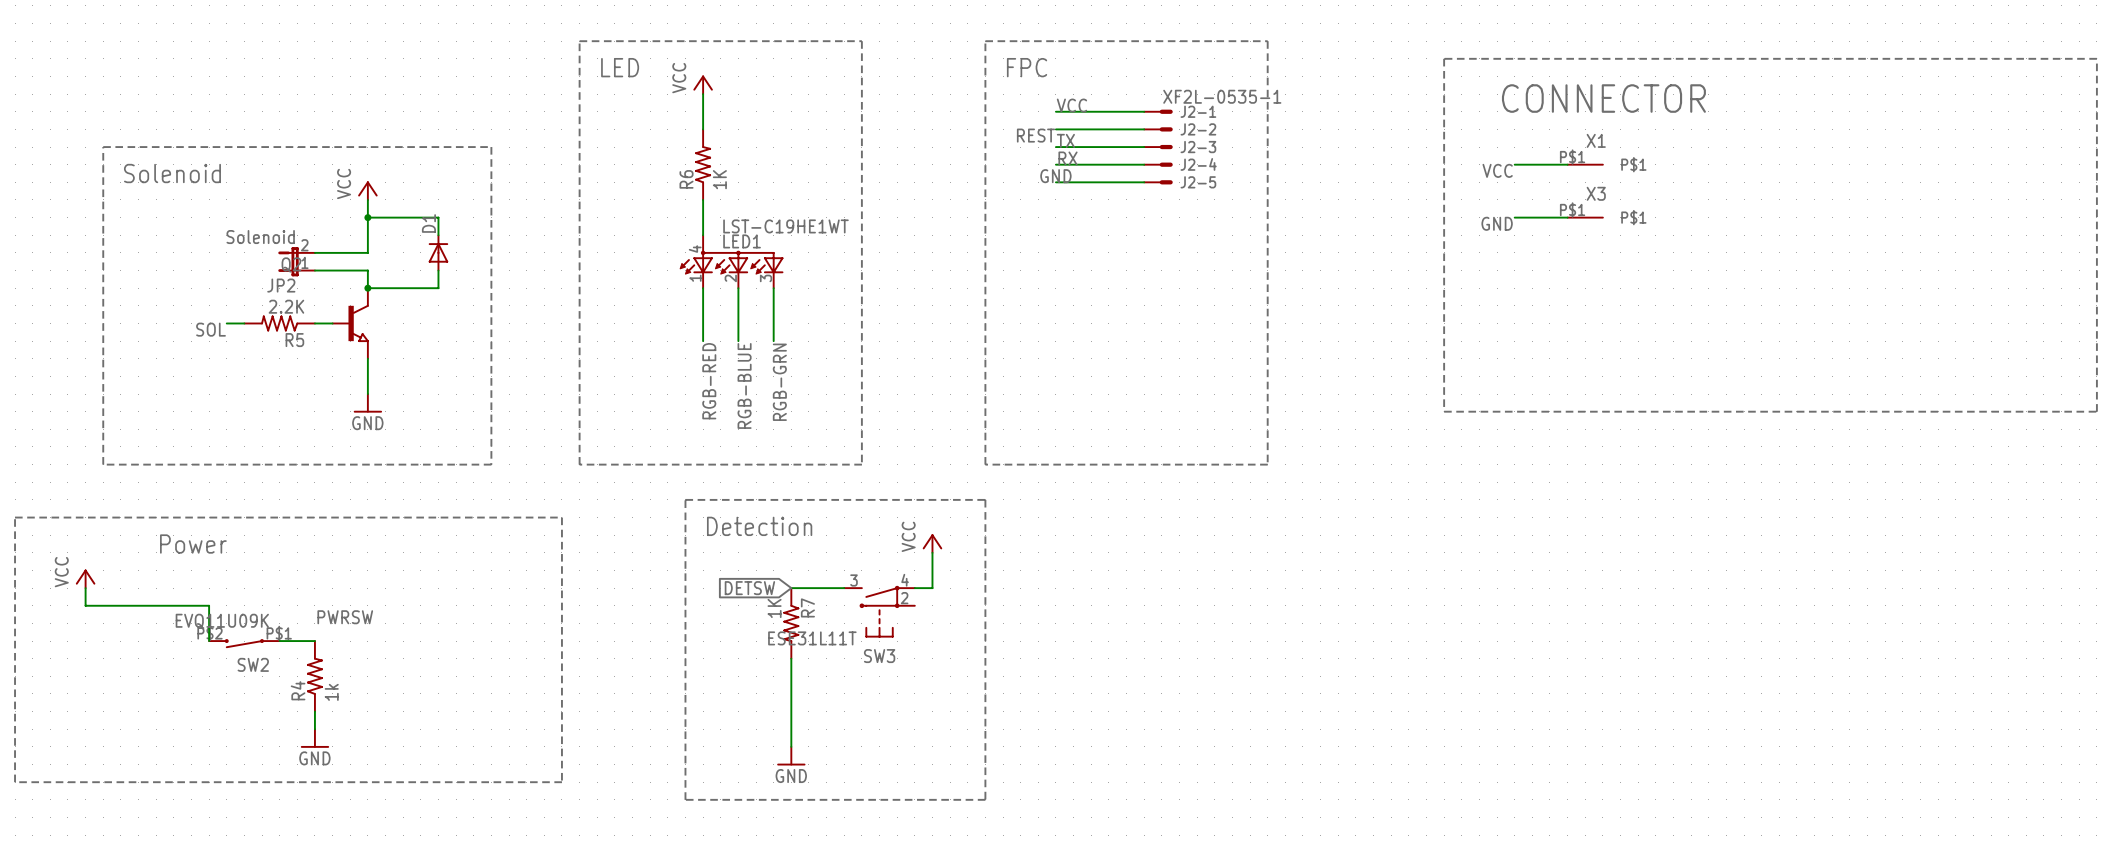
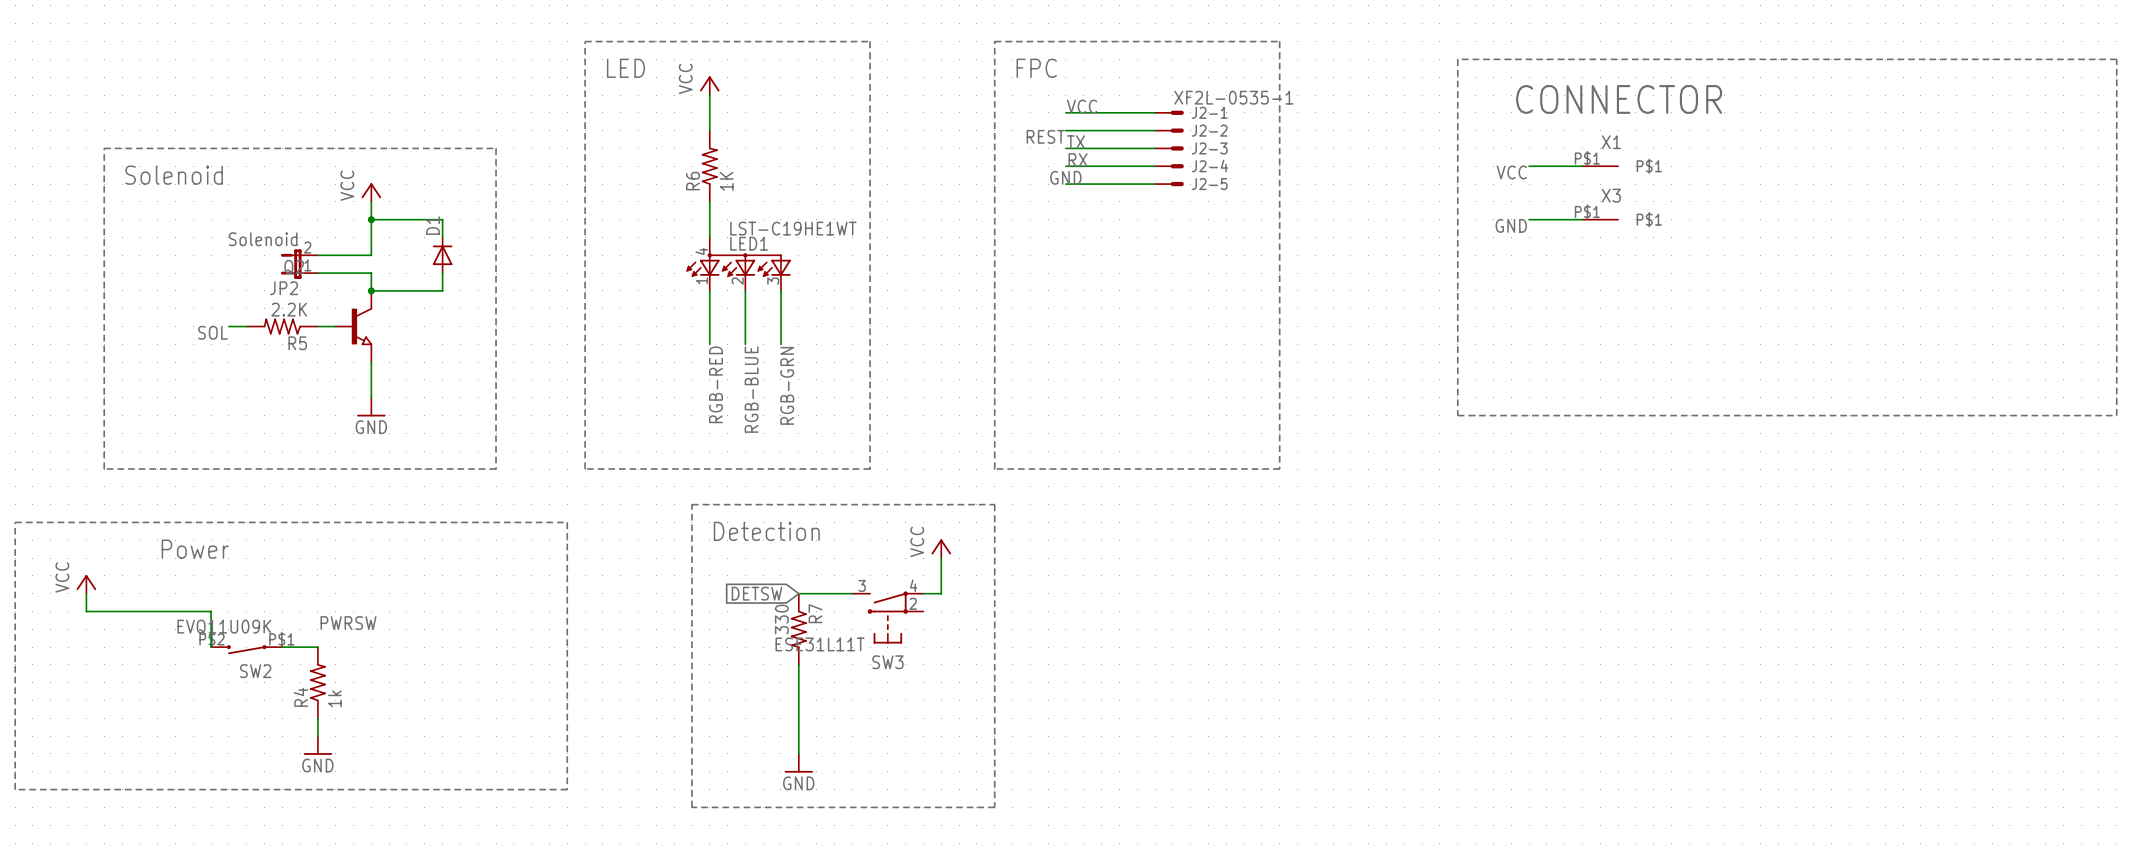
R7 value: 1K (774, 608) -> 330 (781, 619)

